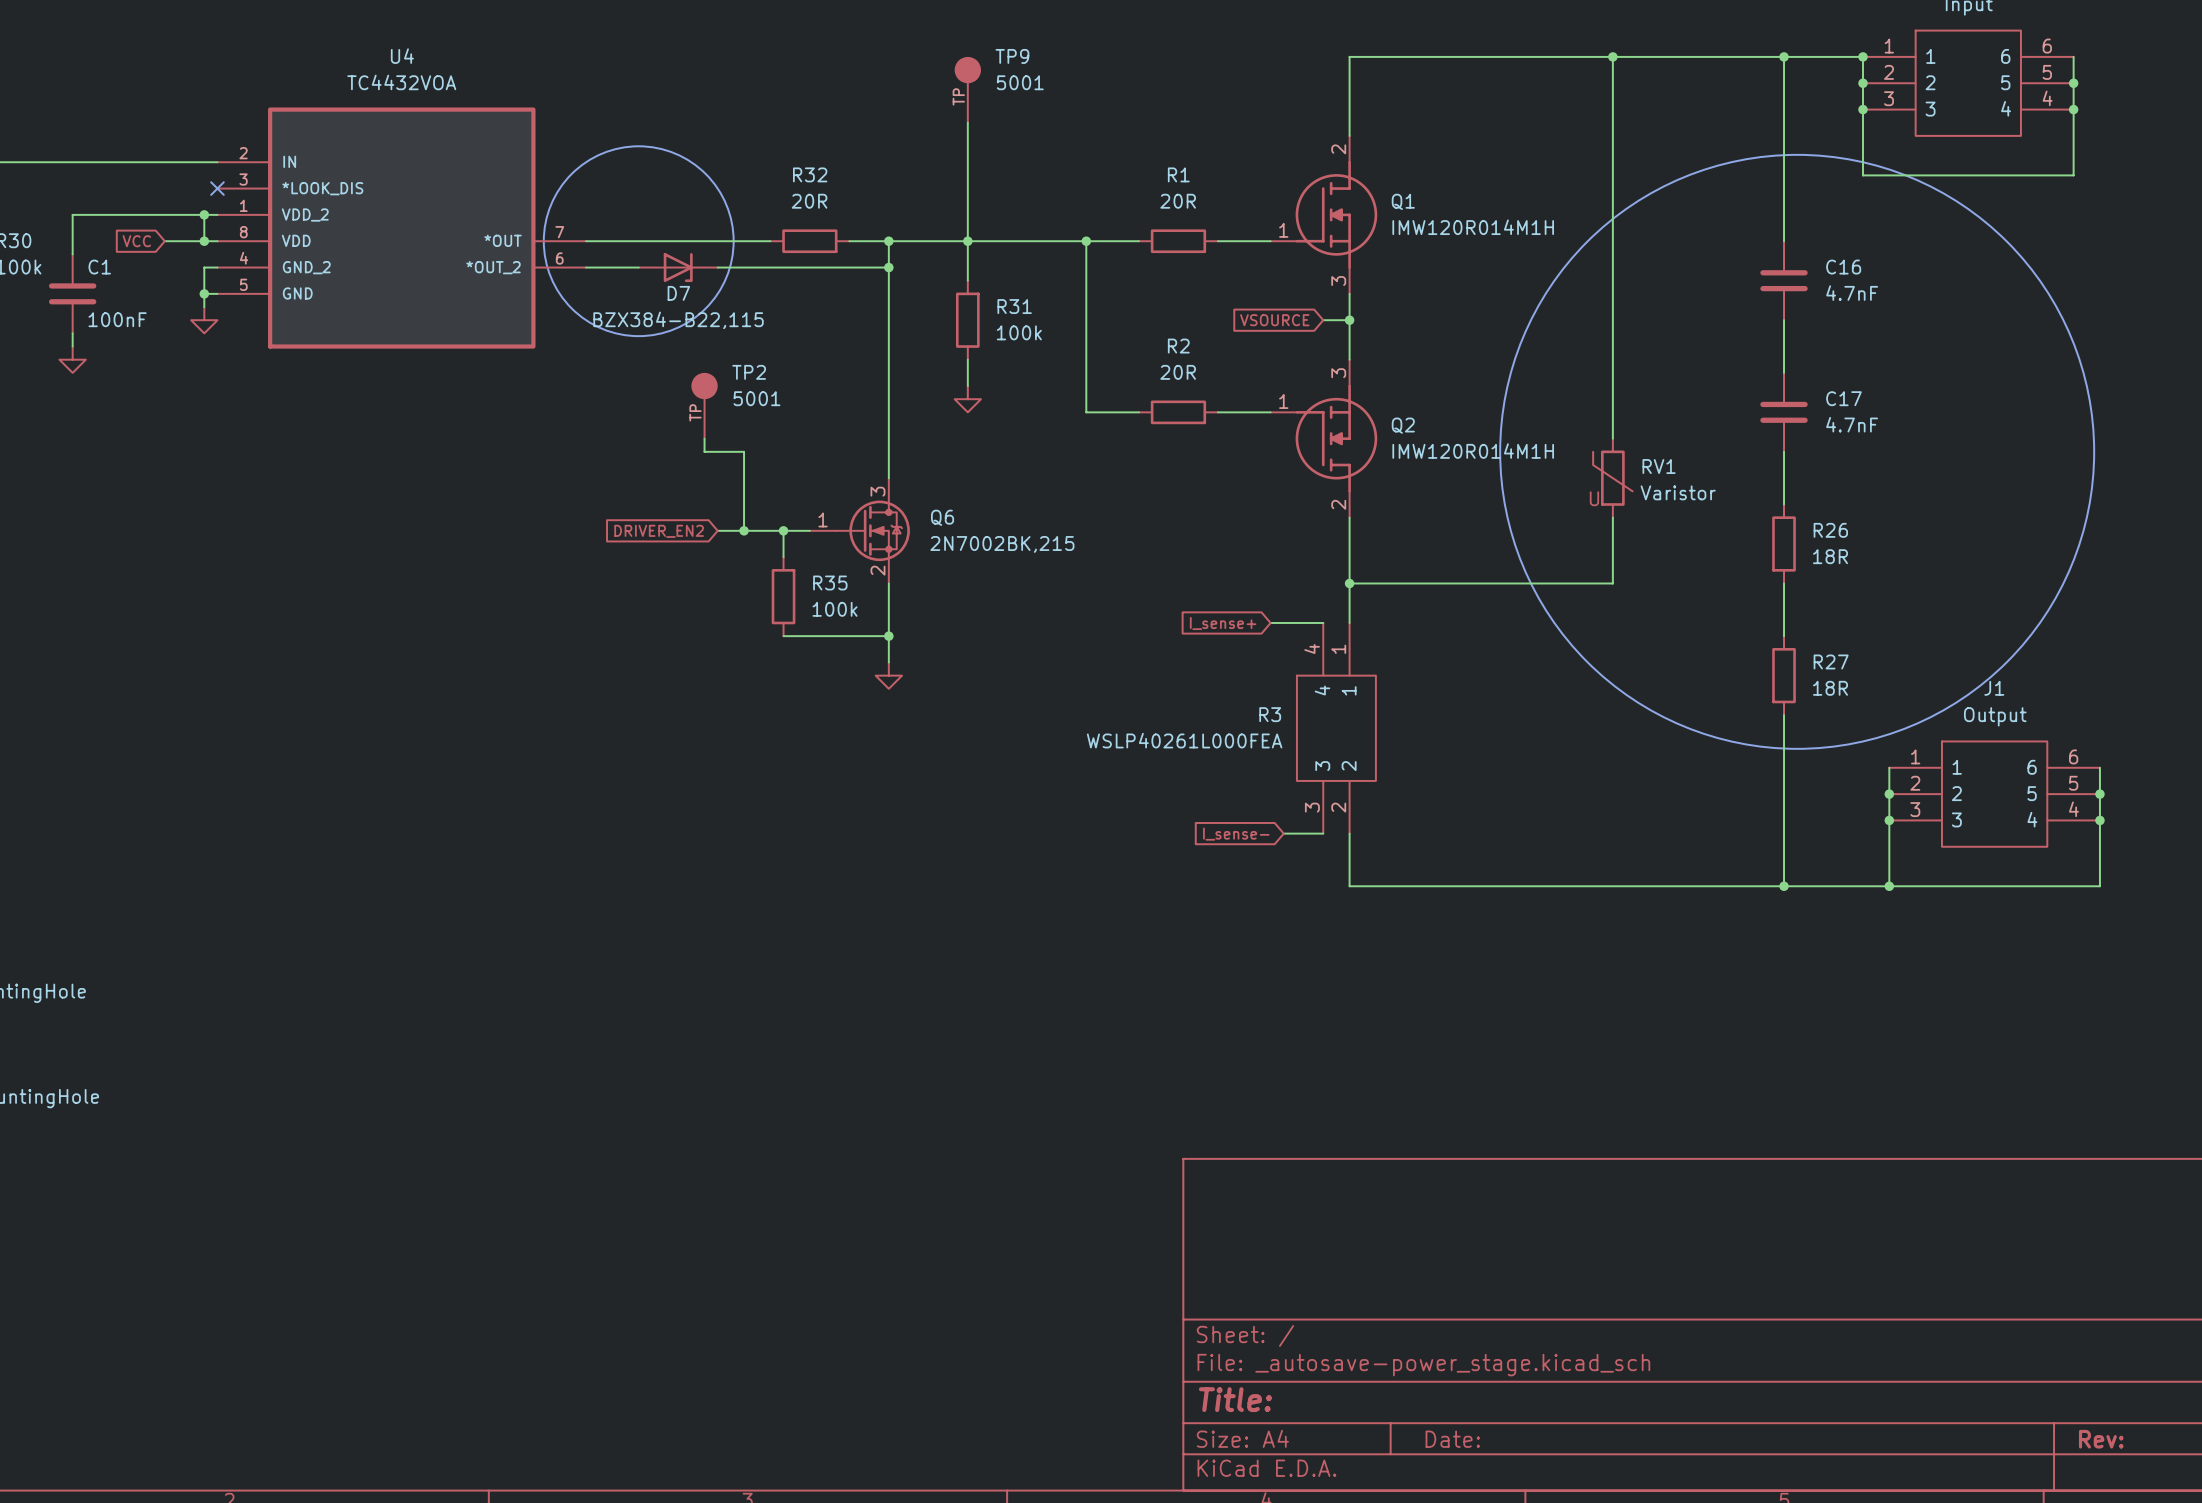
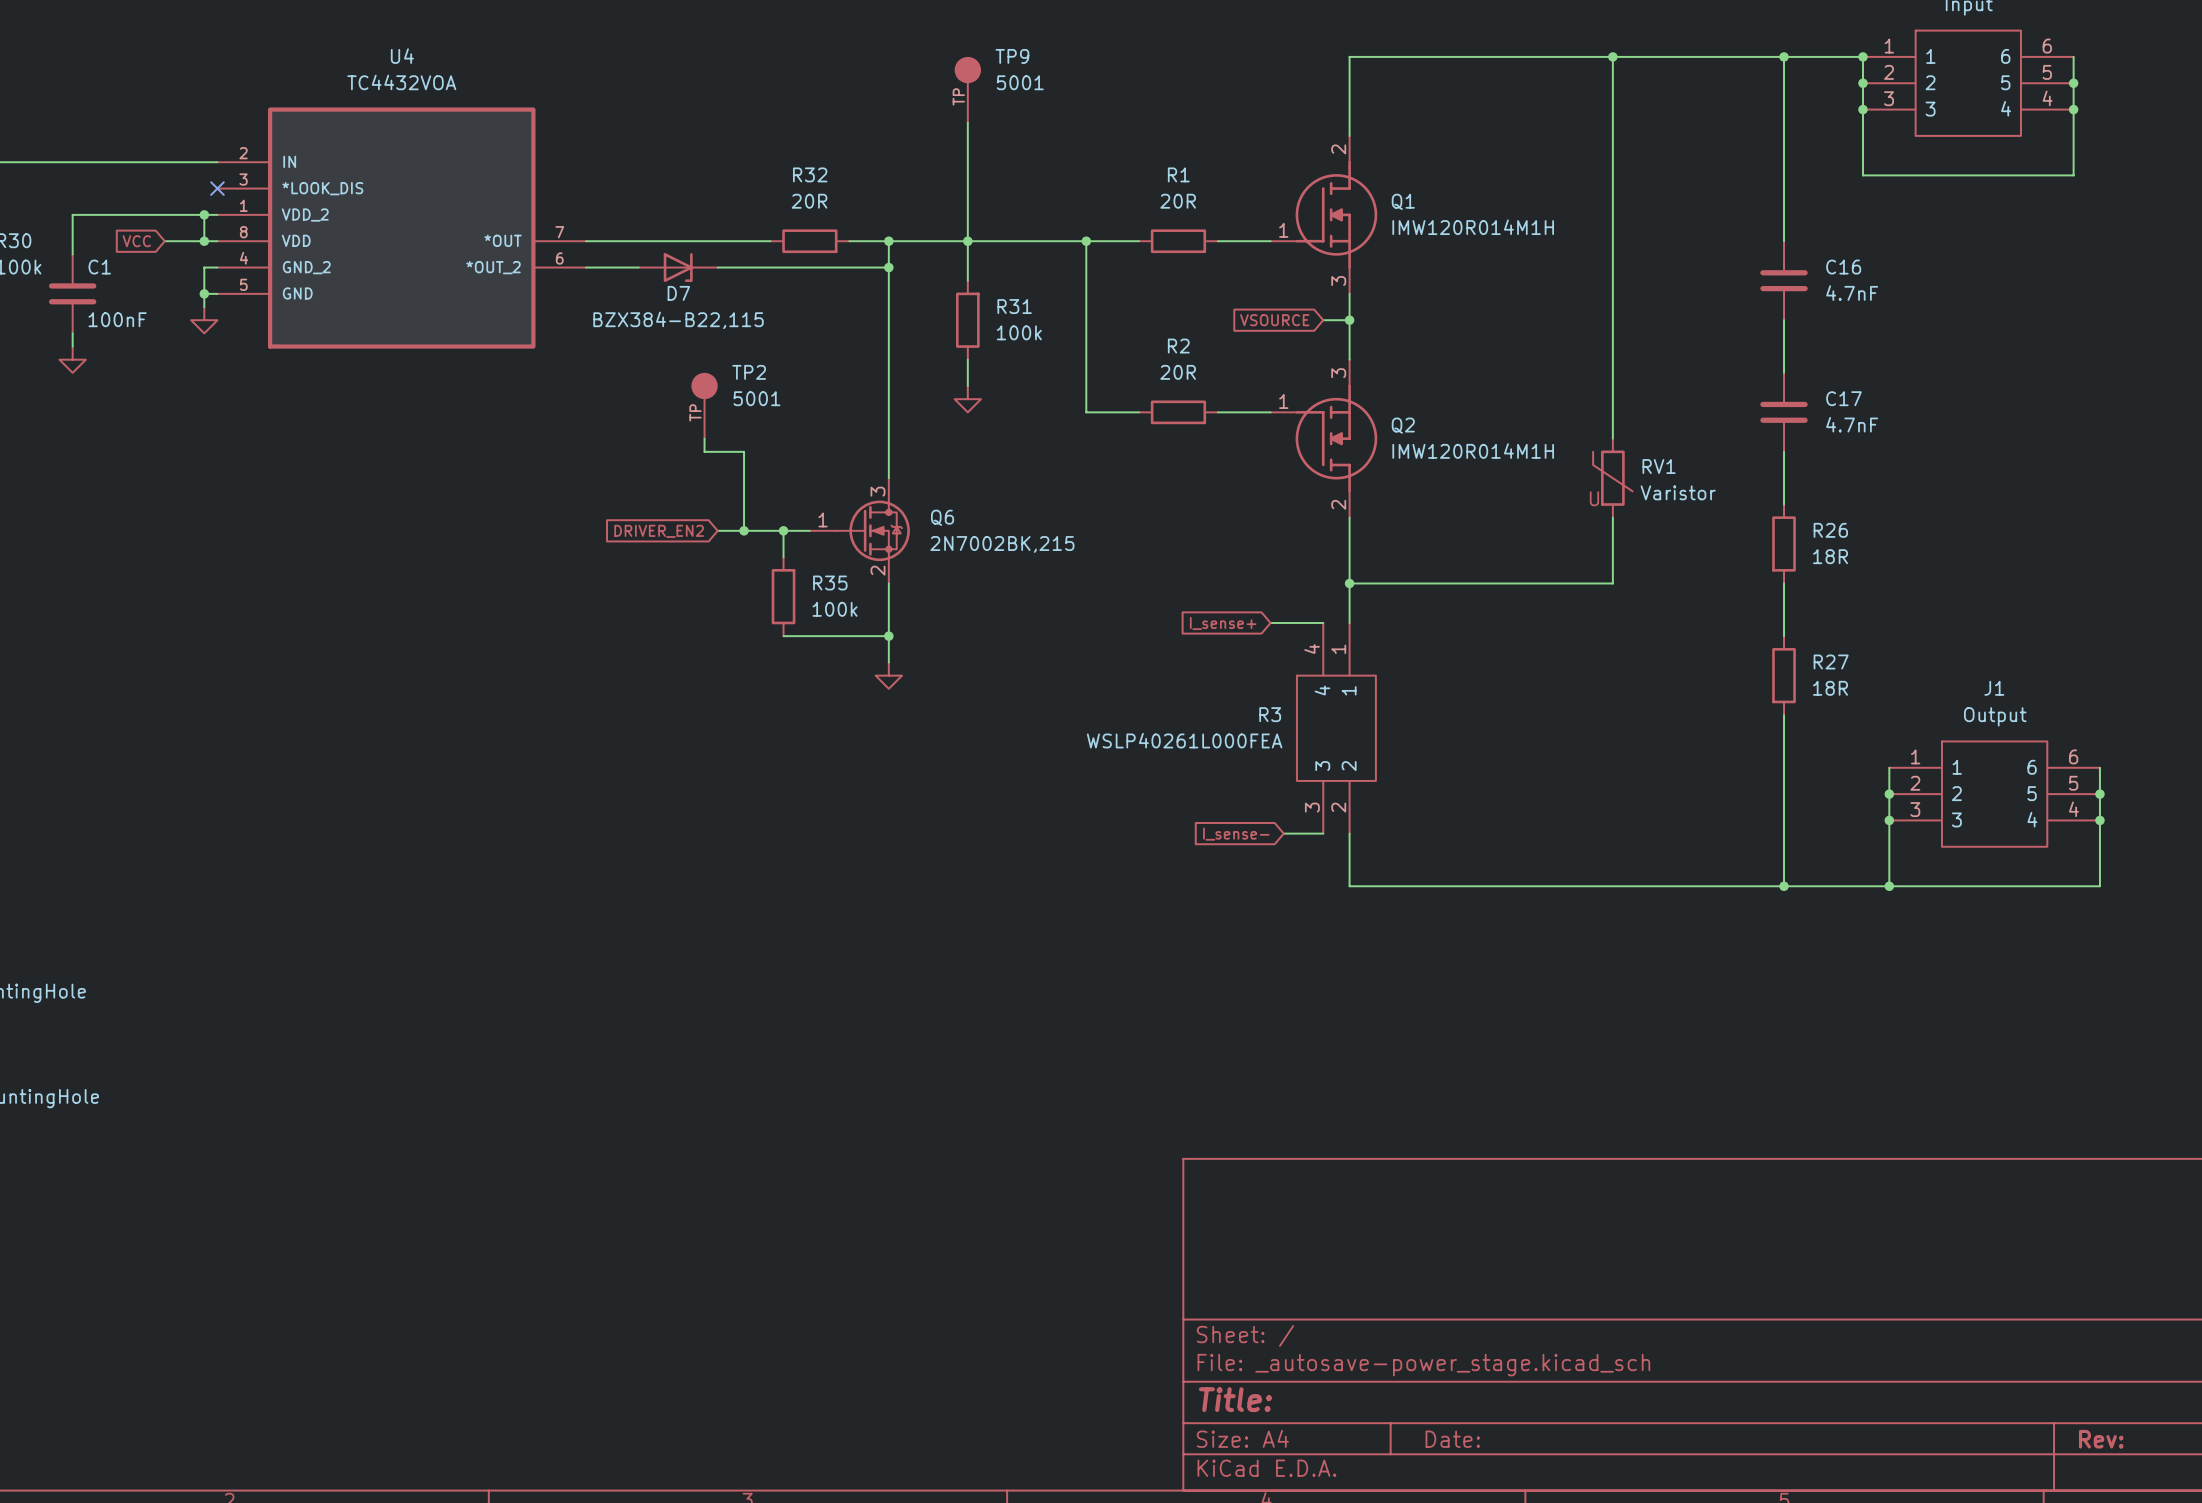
drawing: [543, 146, 734, 337] -> none
drawing: [1500, 154, 2095, 749] -> none

